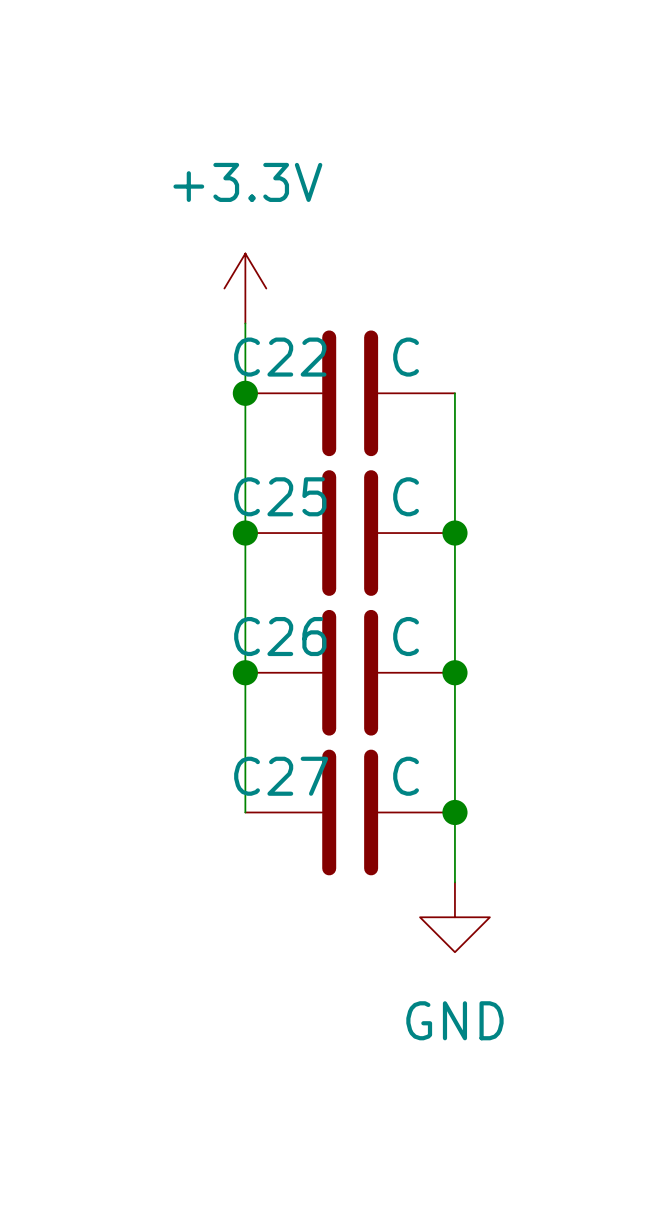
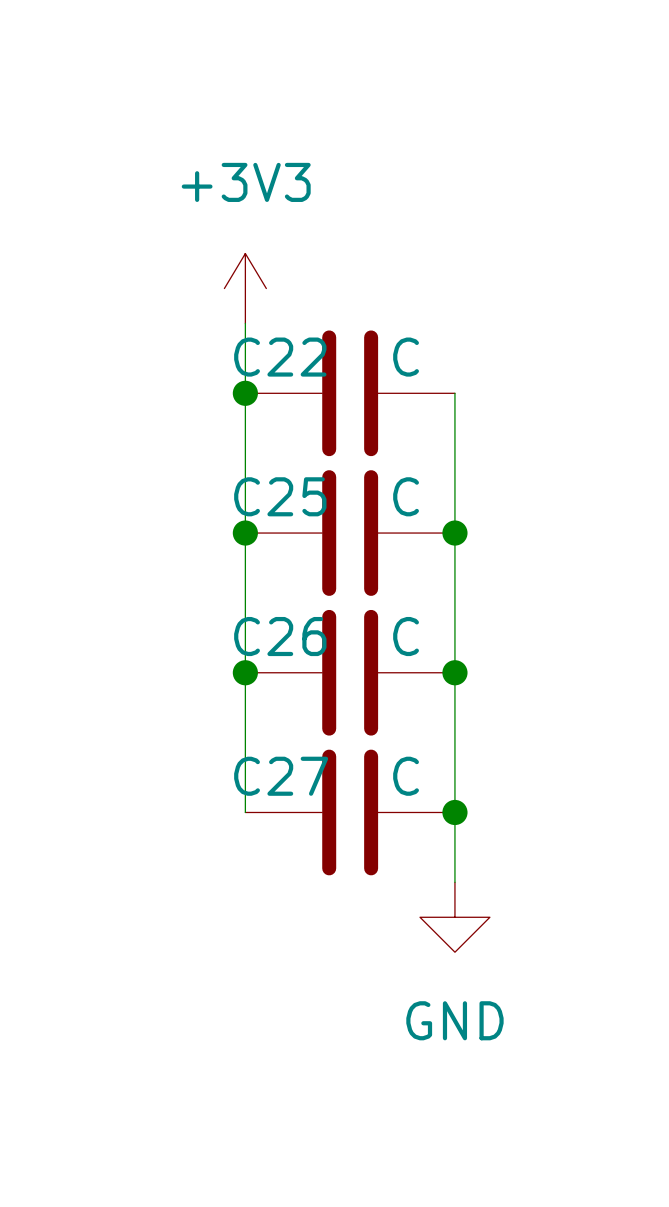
power symbol: +3.3V (245, 288) -> +3V3 (245, 288)

